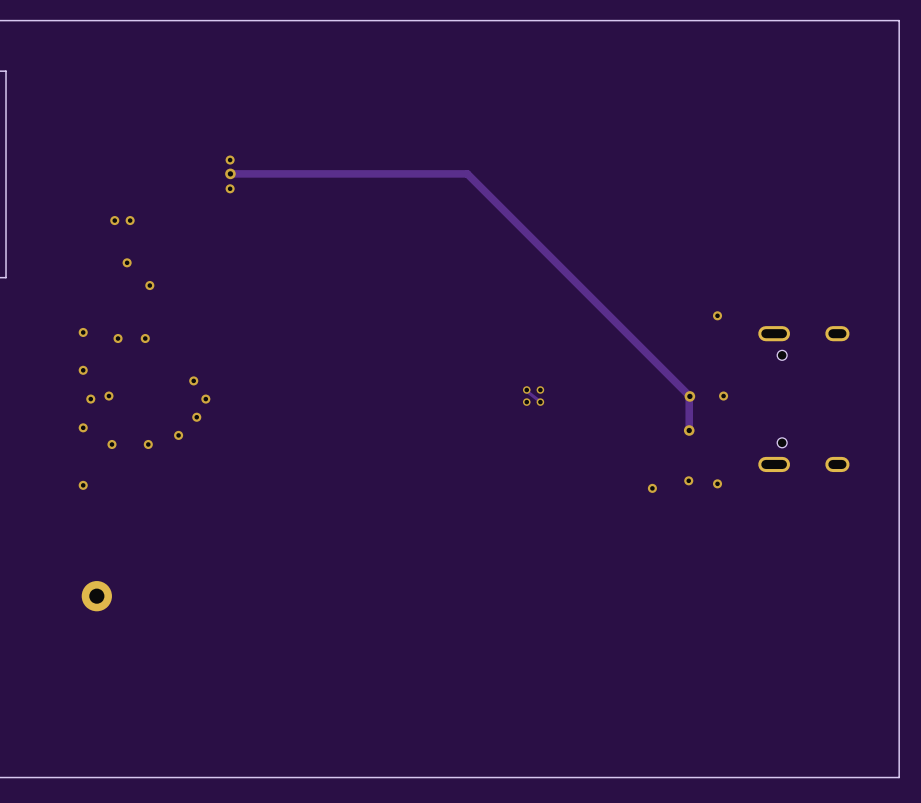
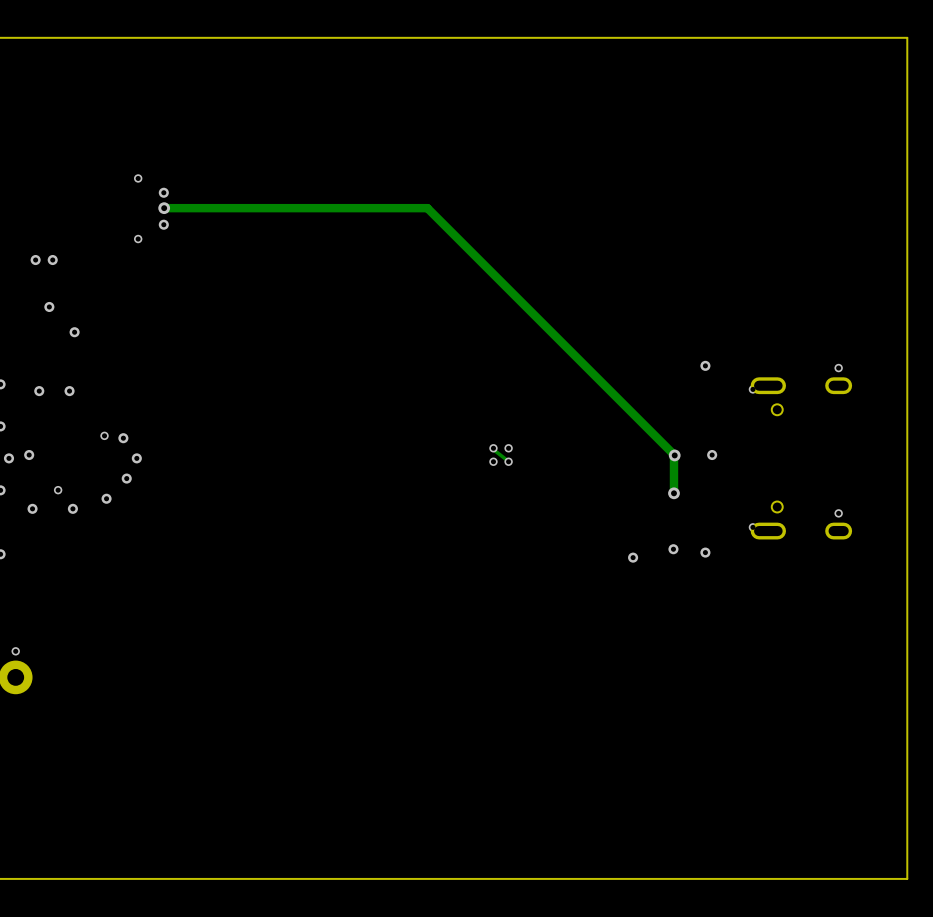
via: none -> (138, 178)
via: none -> (138, 239)
via: none -> (838, 368)
via: none -> (752, 389)
via: none -> (104, 435)
via: none -> (58, 490)
via: none -> (838, 513)
via: none -> (752, 527)
via: none -> (15, 651)

